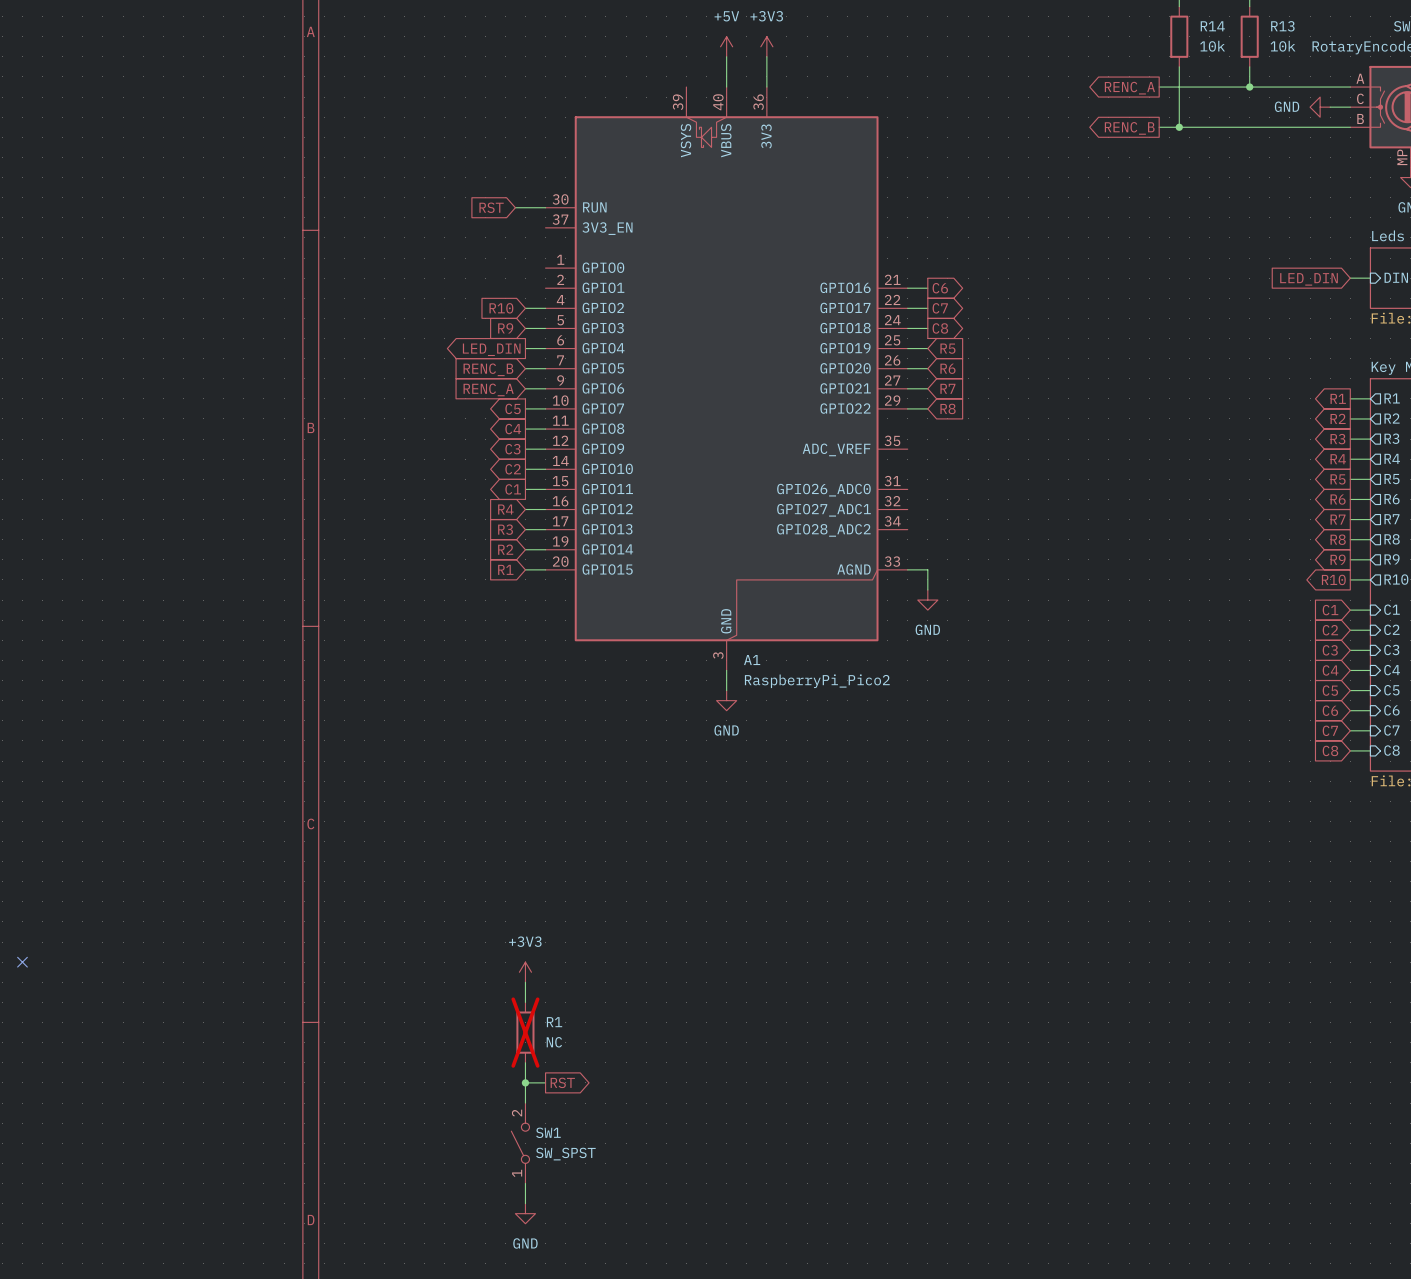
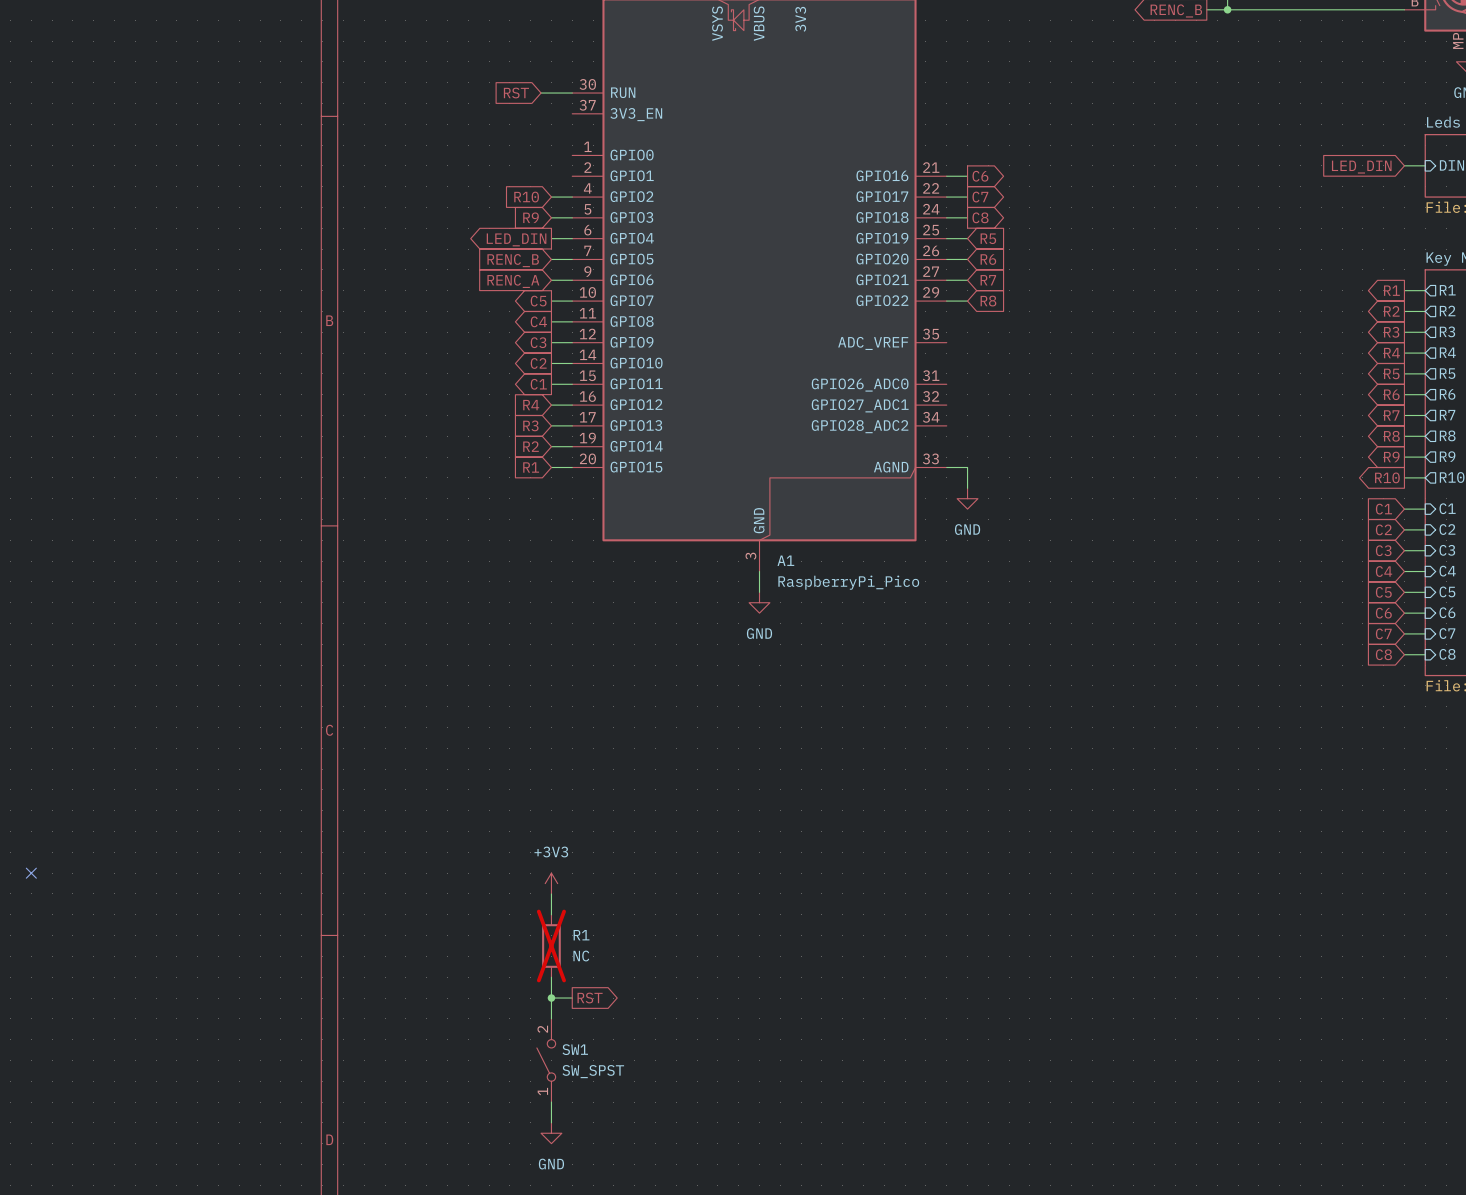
A1 value: RaspberryPi_Pico2 (817, 681) -> RaspberryPi_Pico (848, 582)

